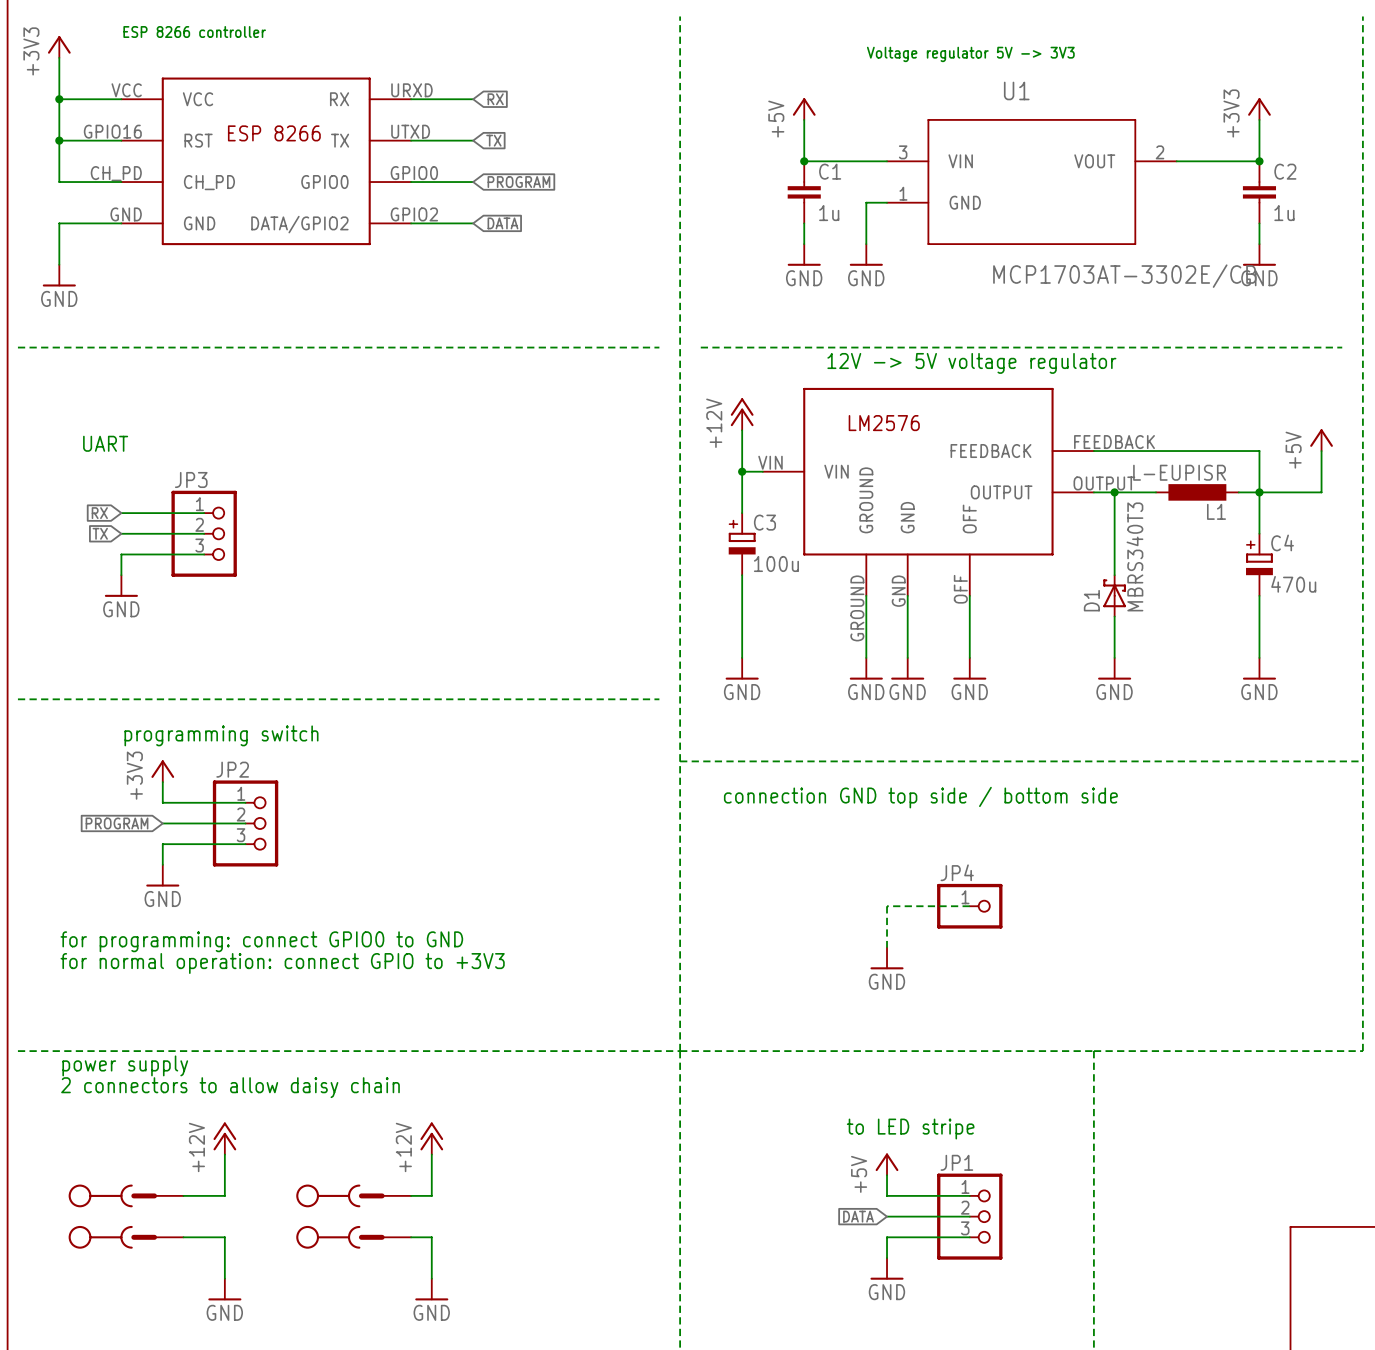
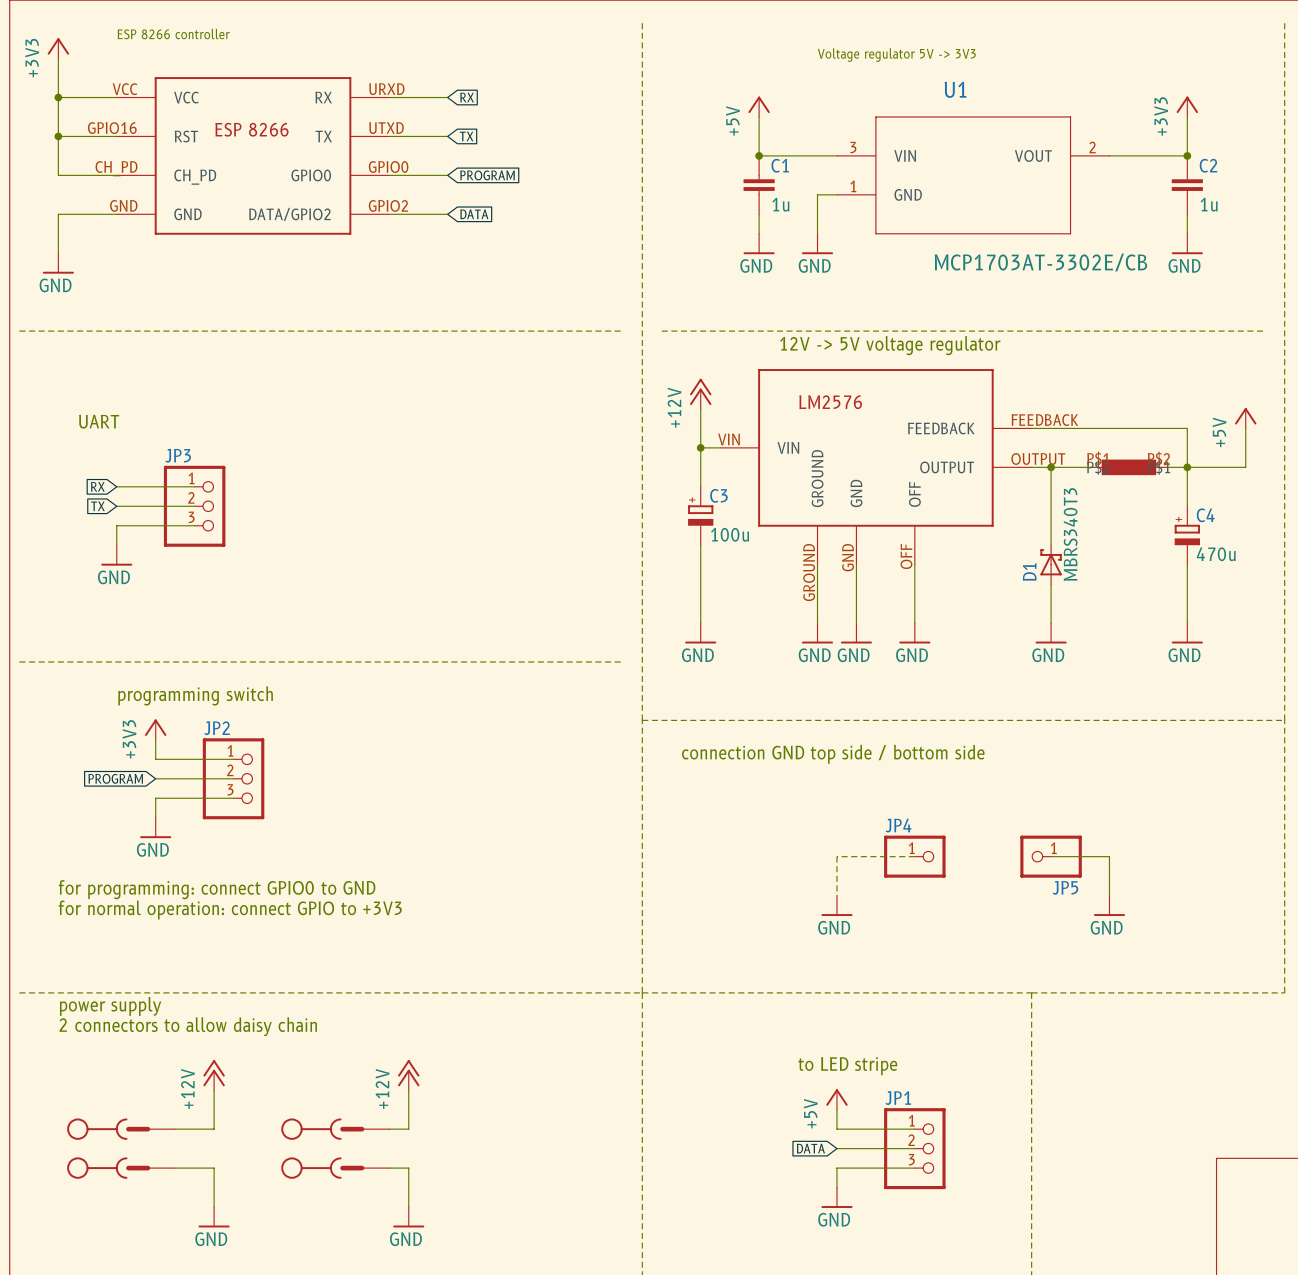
L1: L-EUPISR (1197, 492) -> none
part: none -> (1128, 467)
wire: none -> (1051, 856) (1109, 856) (1109, 895)
JP5: none -> (1051, 856)
power symbol: none -> GND (1109, 905)

